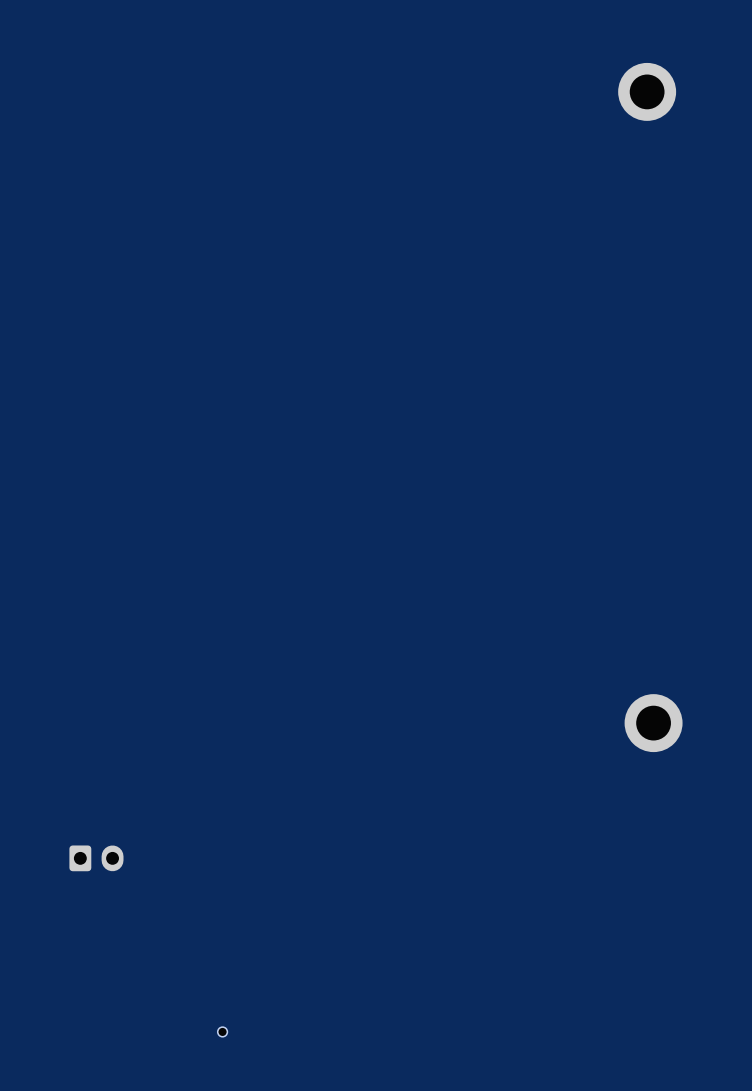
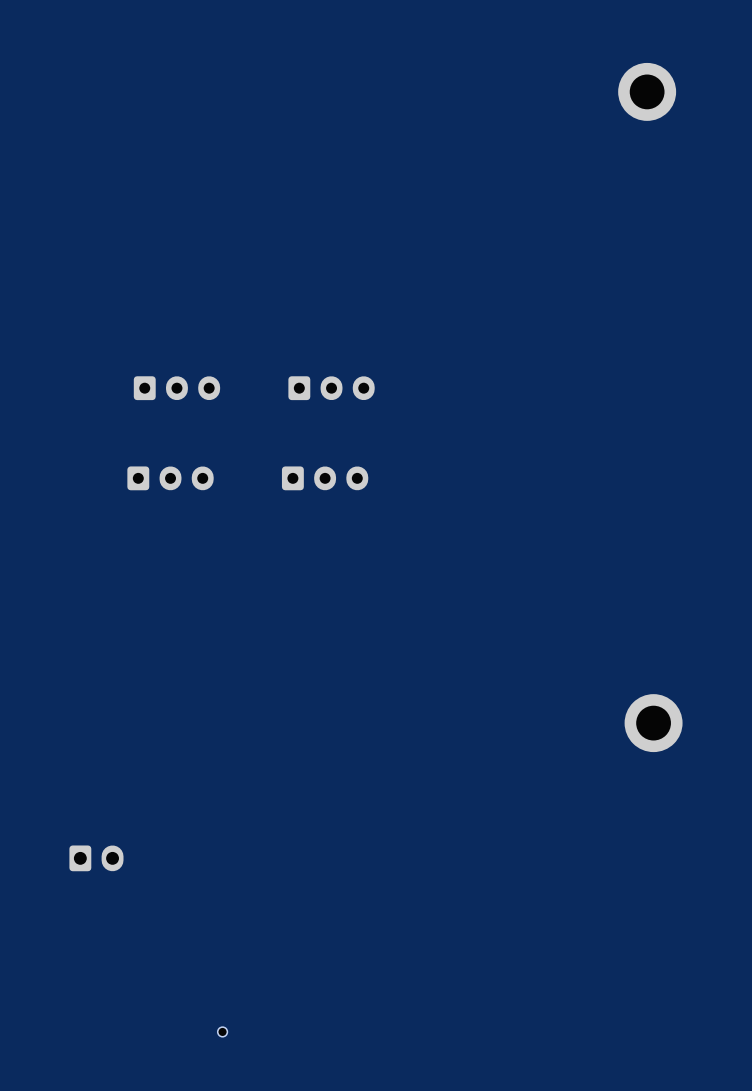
part: none -> (176, 388)
part: none -> (331, 388)
part: none -> (170, 478)
part: none -> (325, 478)

